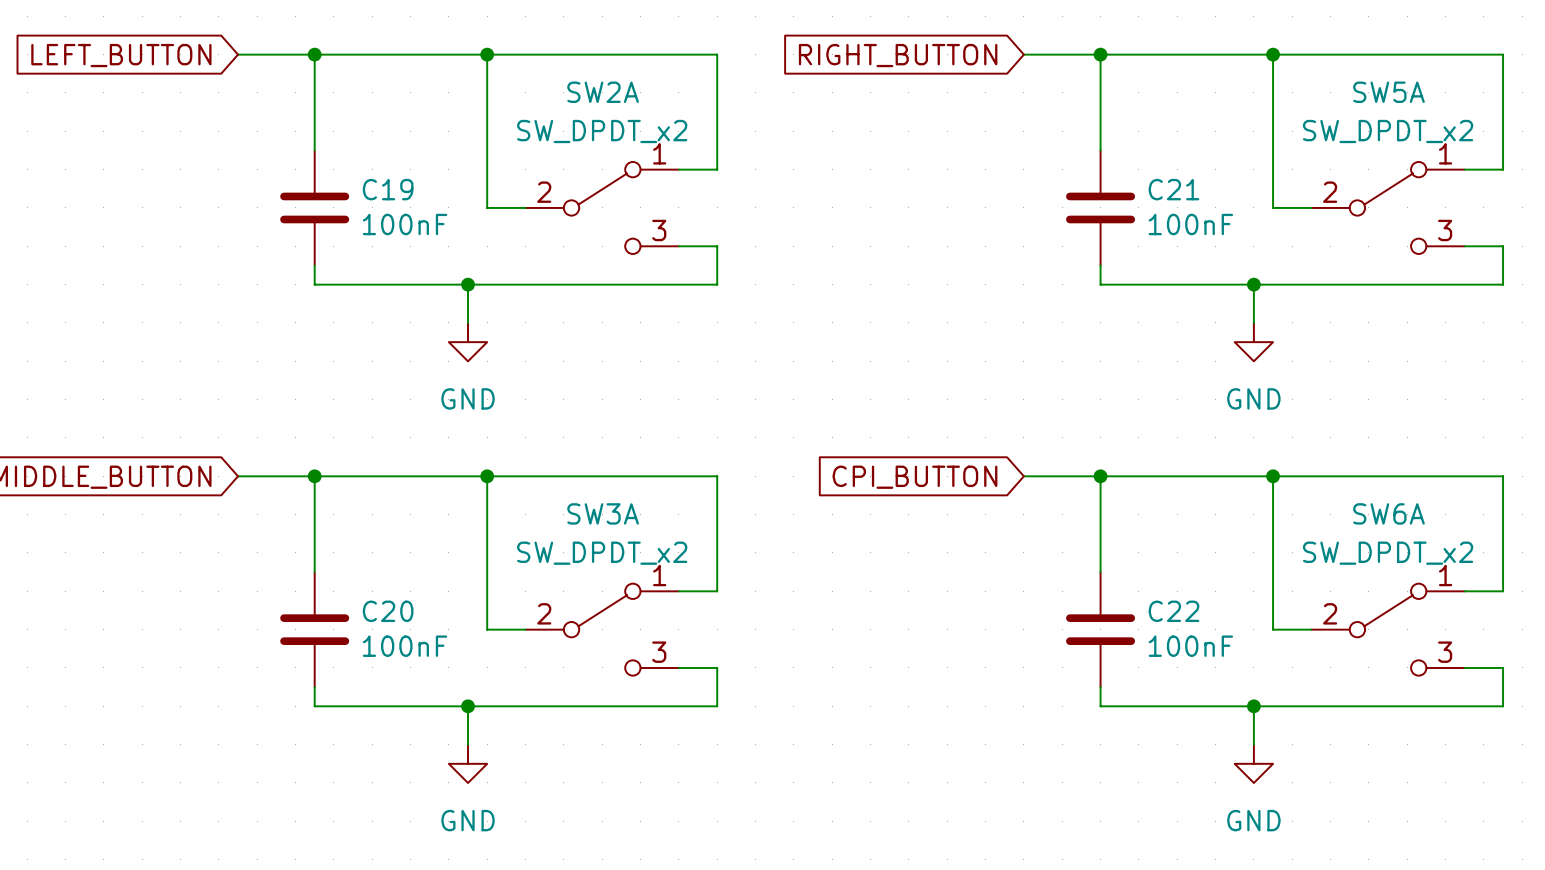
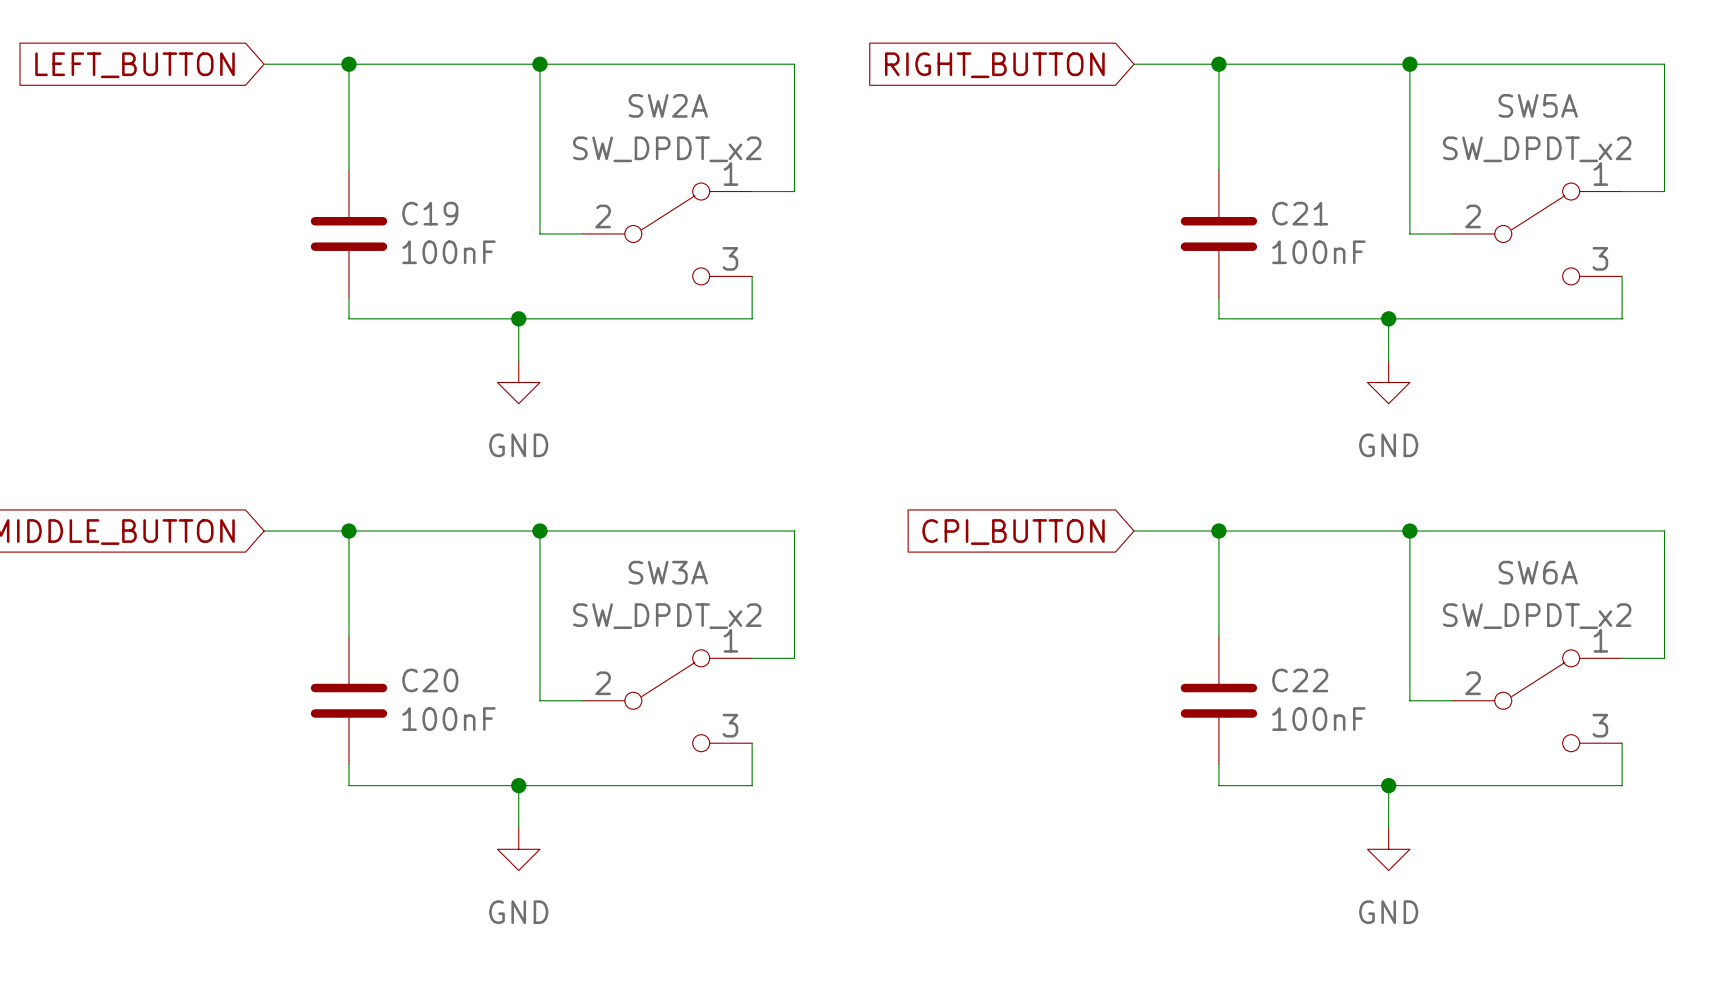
wire: (678, 246) (717, 246) (717, 284) (678, 284) -> (752, 276) (752, 318)
wire: (1464, 246) (1503, 246) (1503, 284) (1464, 284) -> (1622, 276) (1622, 318)
wire: (678, 667) (717, 667) (717, 706) (678, 706) -> (752, 743) (752, 785)
wire: (1464, 667) (1503, 667) (1503, 706) (1464, 706) -> (1622, 743) (1622, 785)

